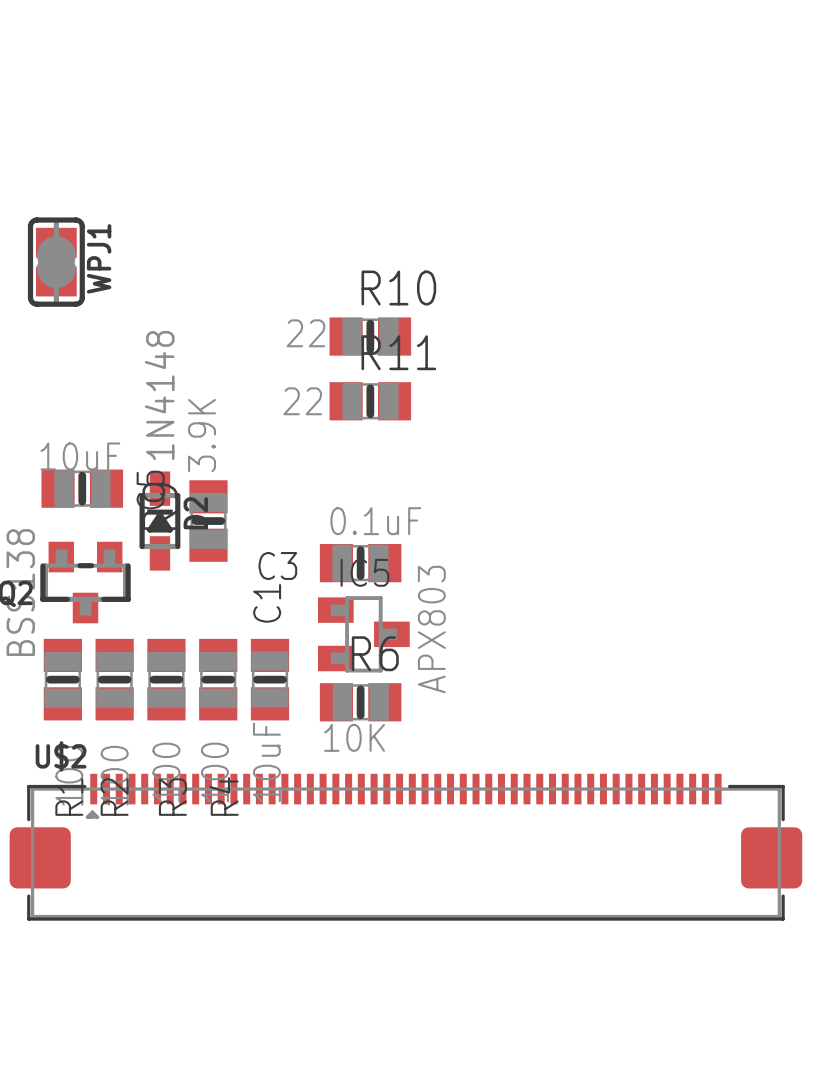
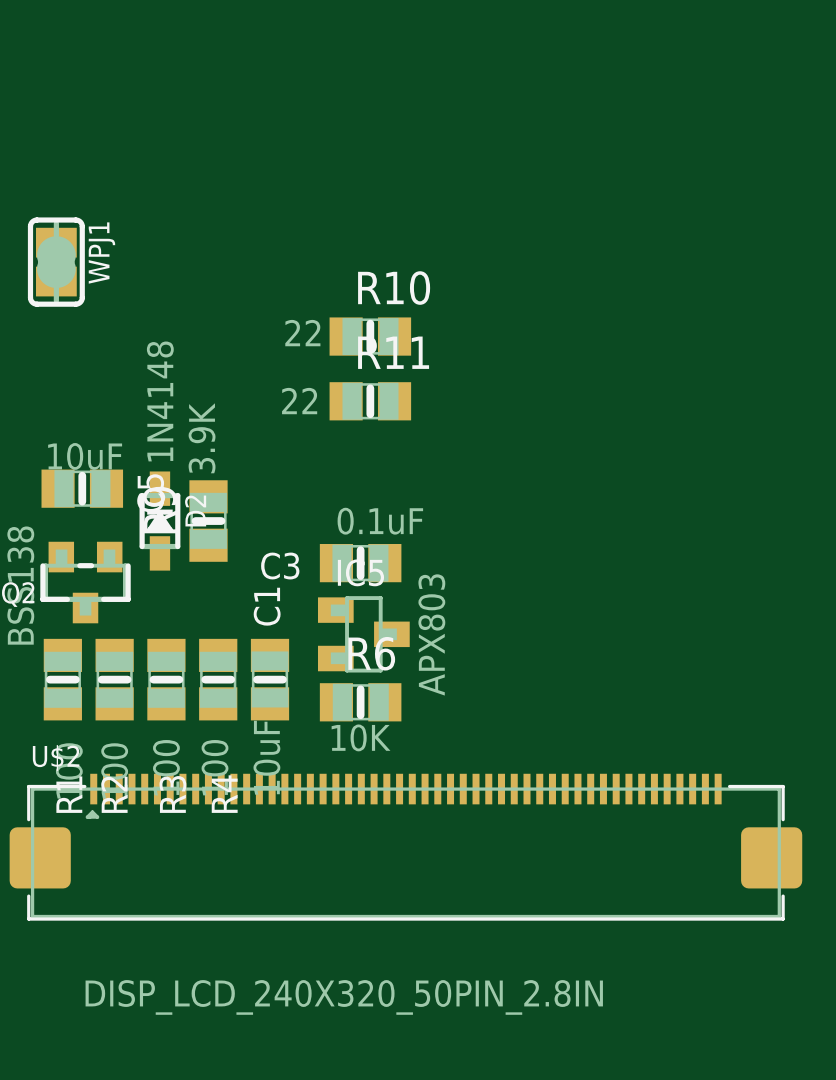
U$2 value: none -> DISP_LCD_240X320_50PIN_2.8IN (344, 997)

